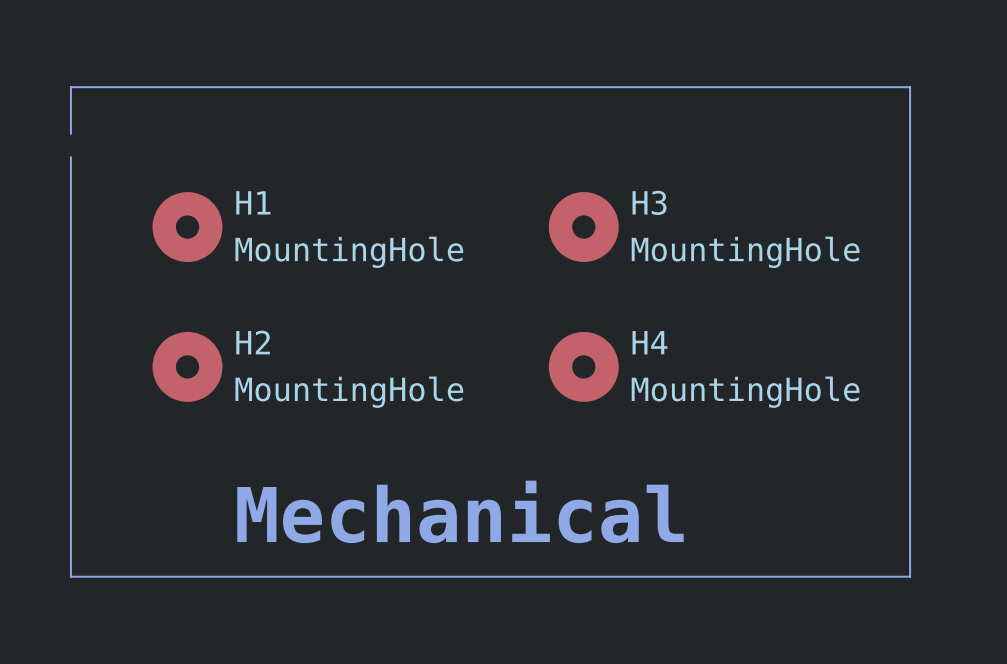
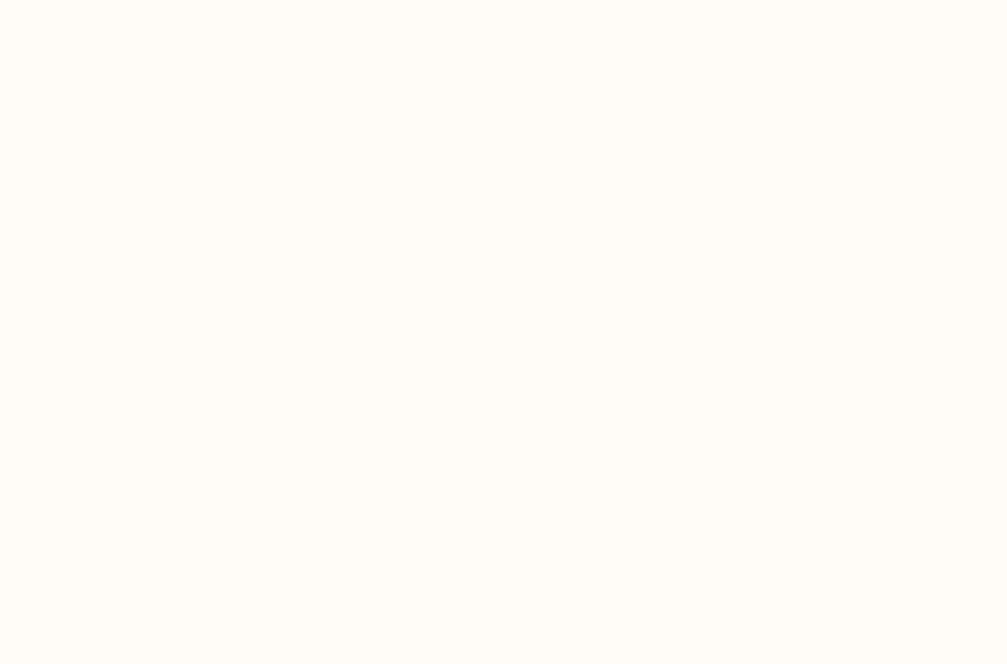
line: (70, 133) (70, 87) (910, 87) (910, 576) (70, 576) (70, 157) -> none
H1: MountingHole (187, 227) -> none
H3: MountingHole (583, 227) -> none
H2: MountingHole (187, 366) -> none
H4: MountingHole (583, 366) -> none
text: Mechanical (460, 511) -> none

